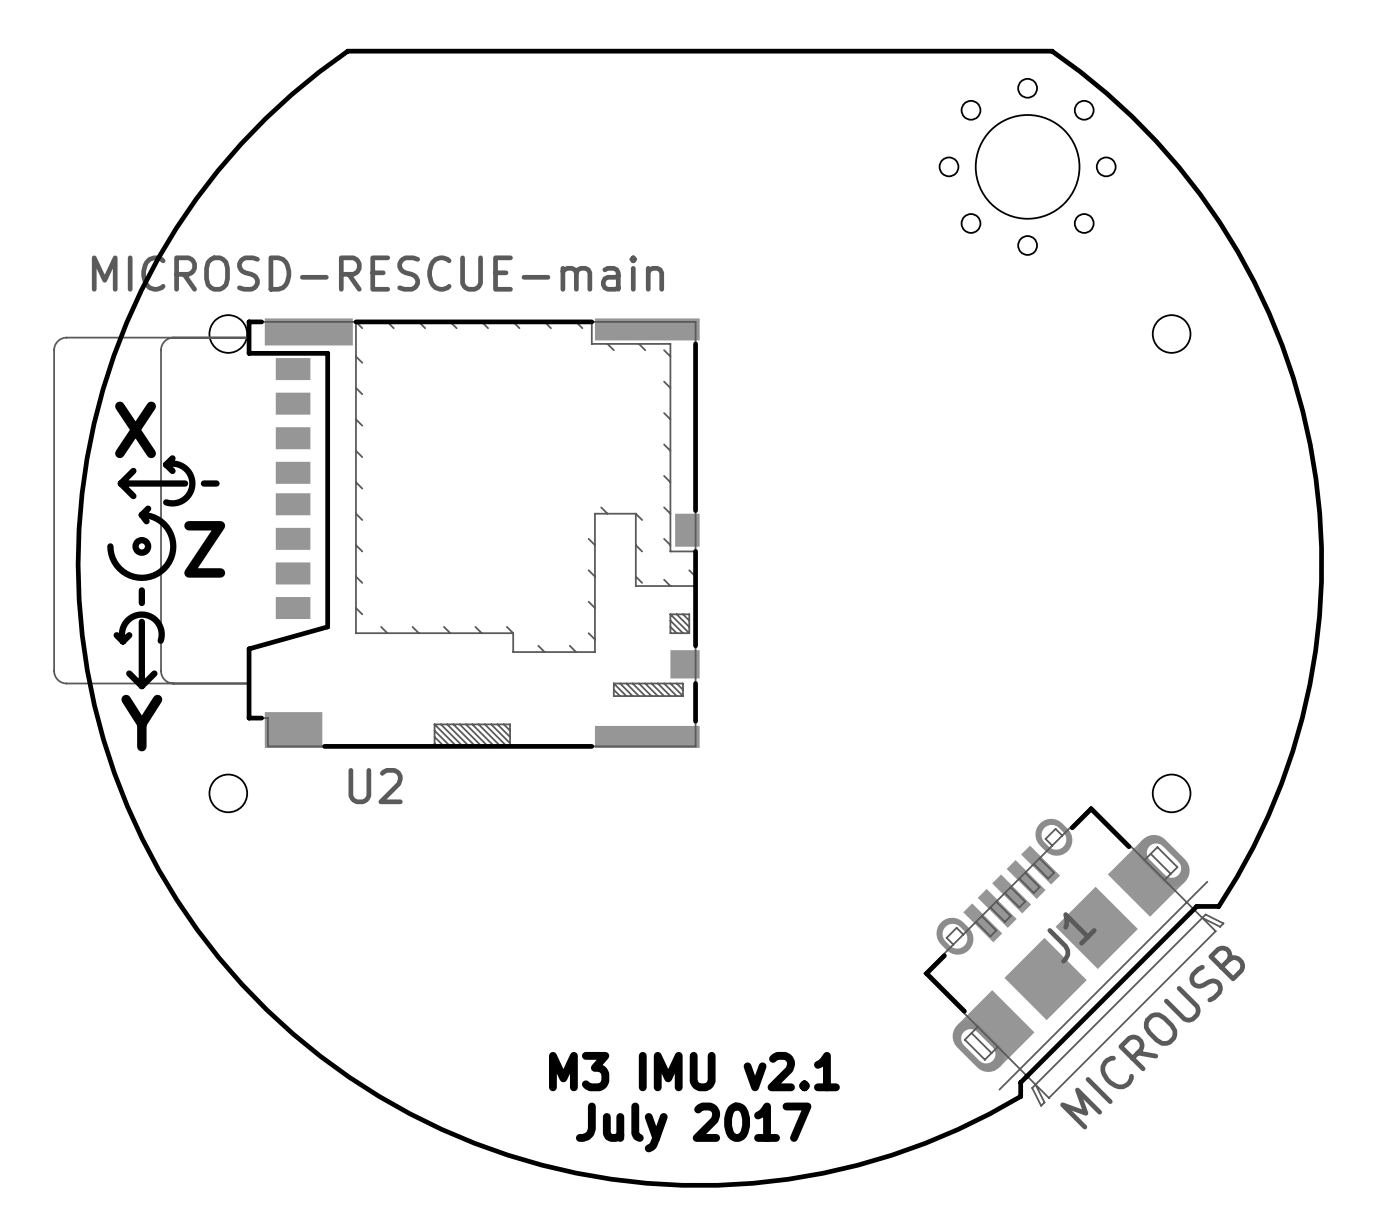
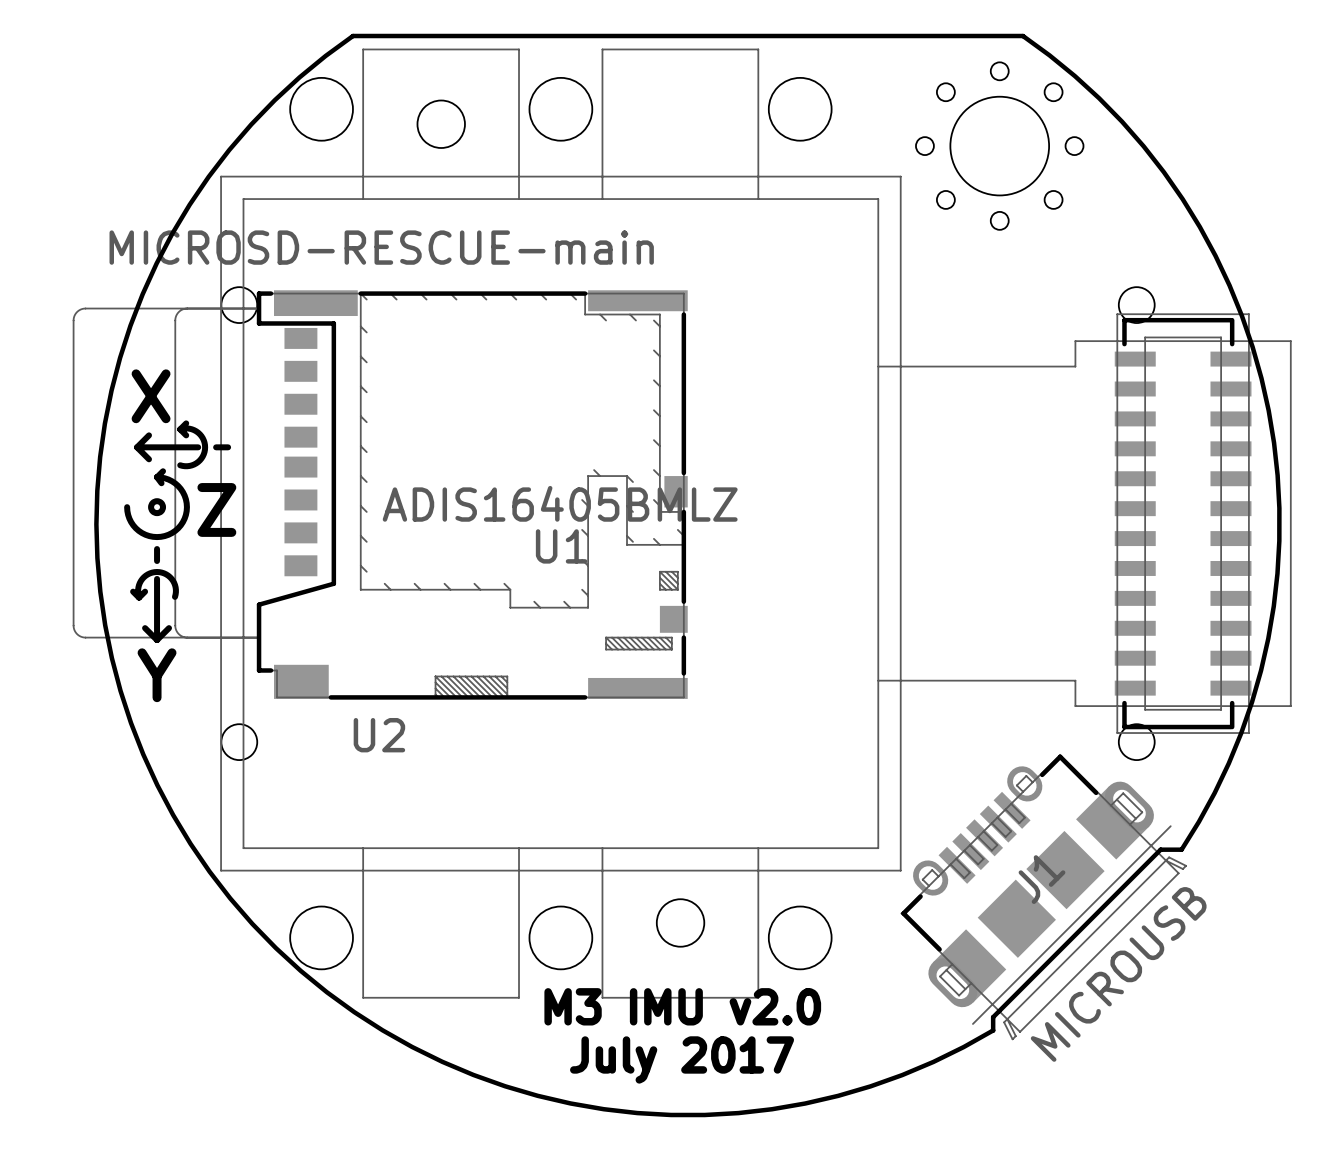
U1: none -> ADIS16405BMLZ (755, 523)
text: M3 IMU v2.1 (694, 1071) -> M3 IMU v2.0 (682, 1006)

